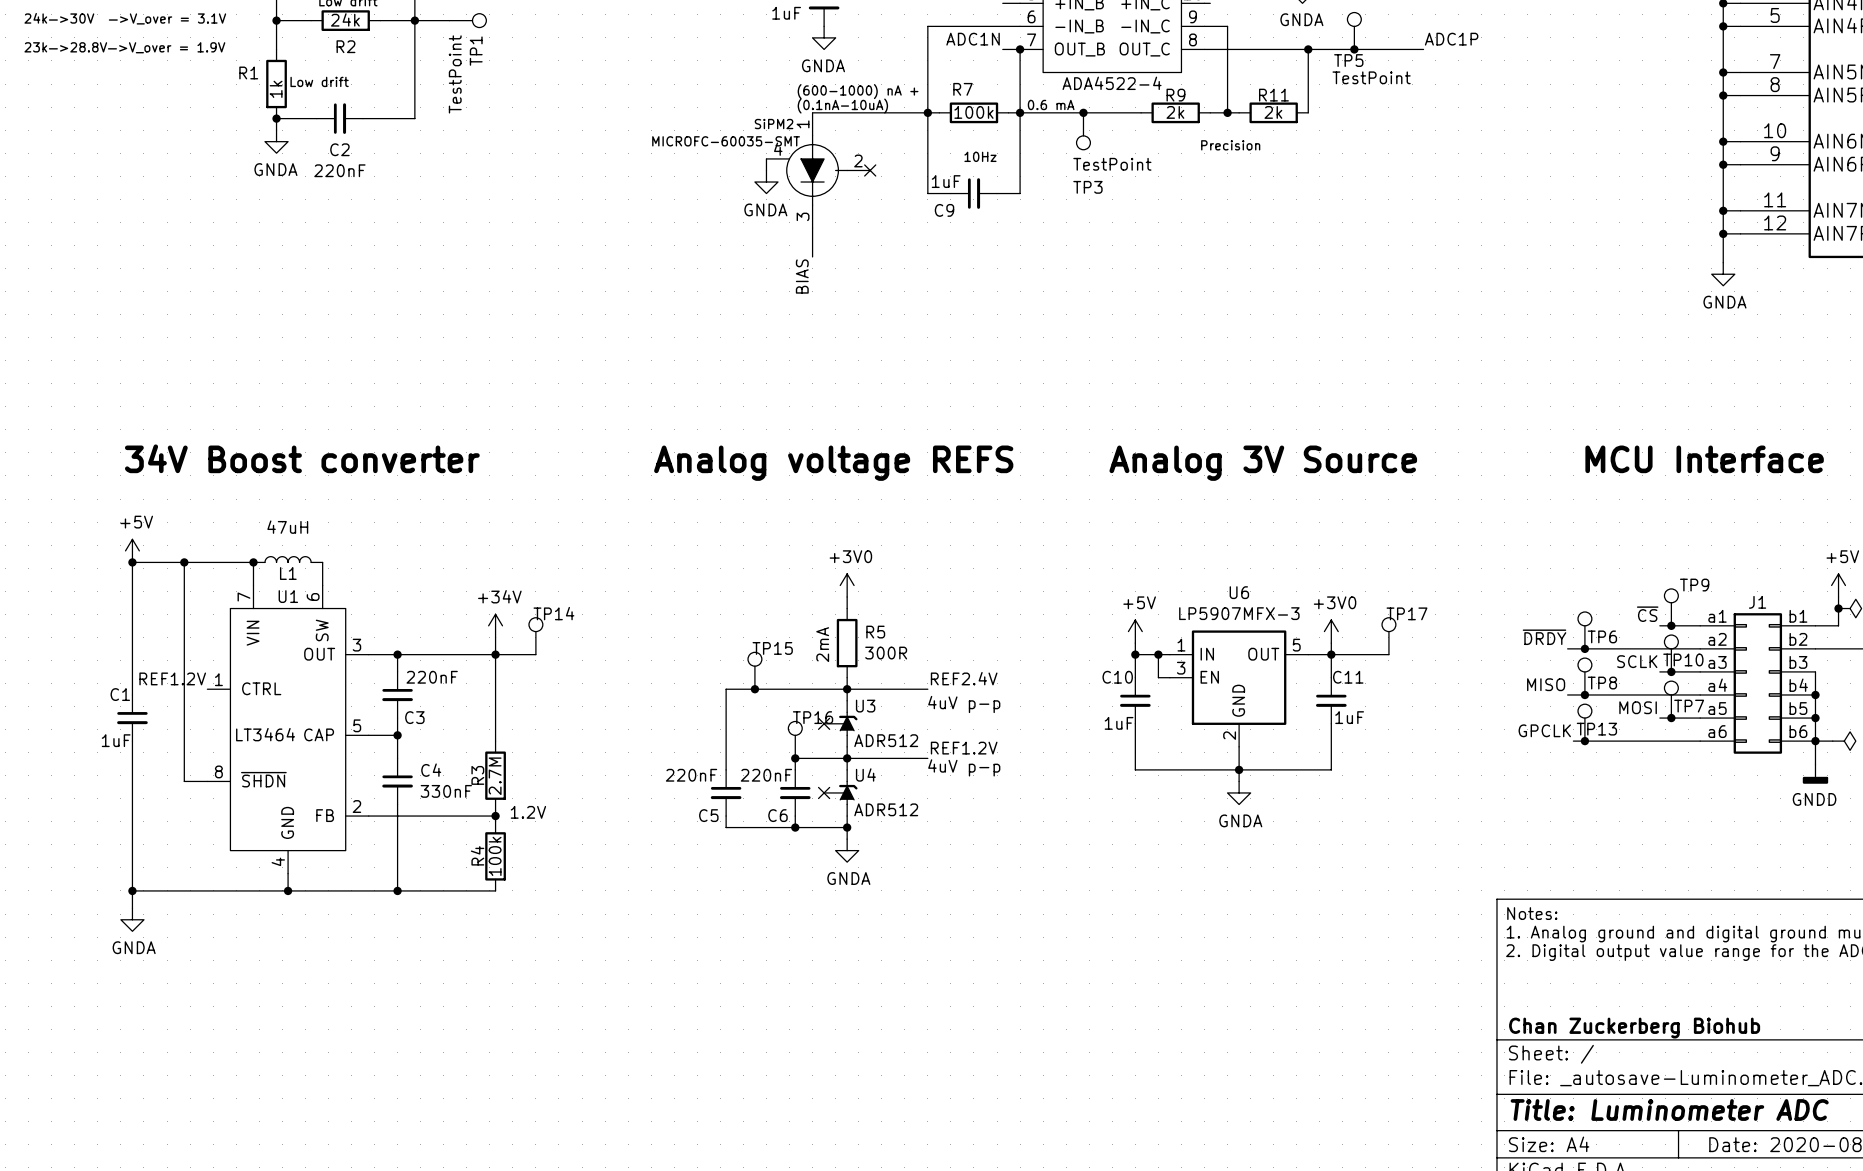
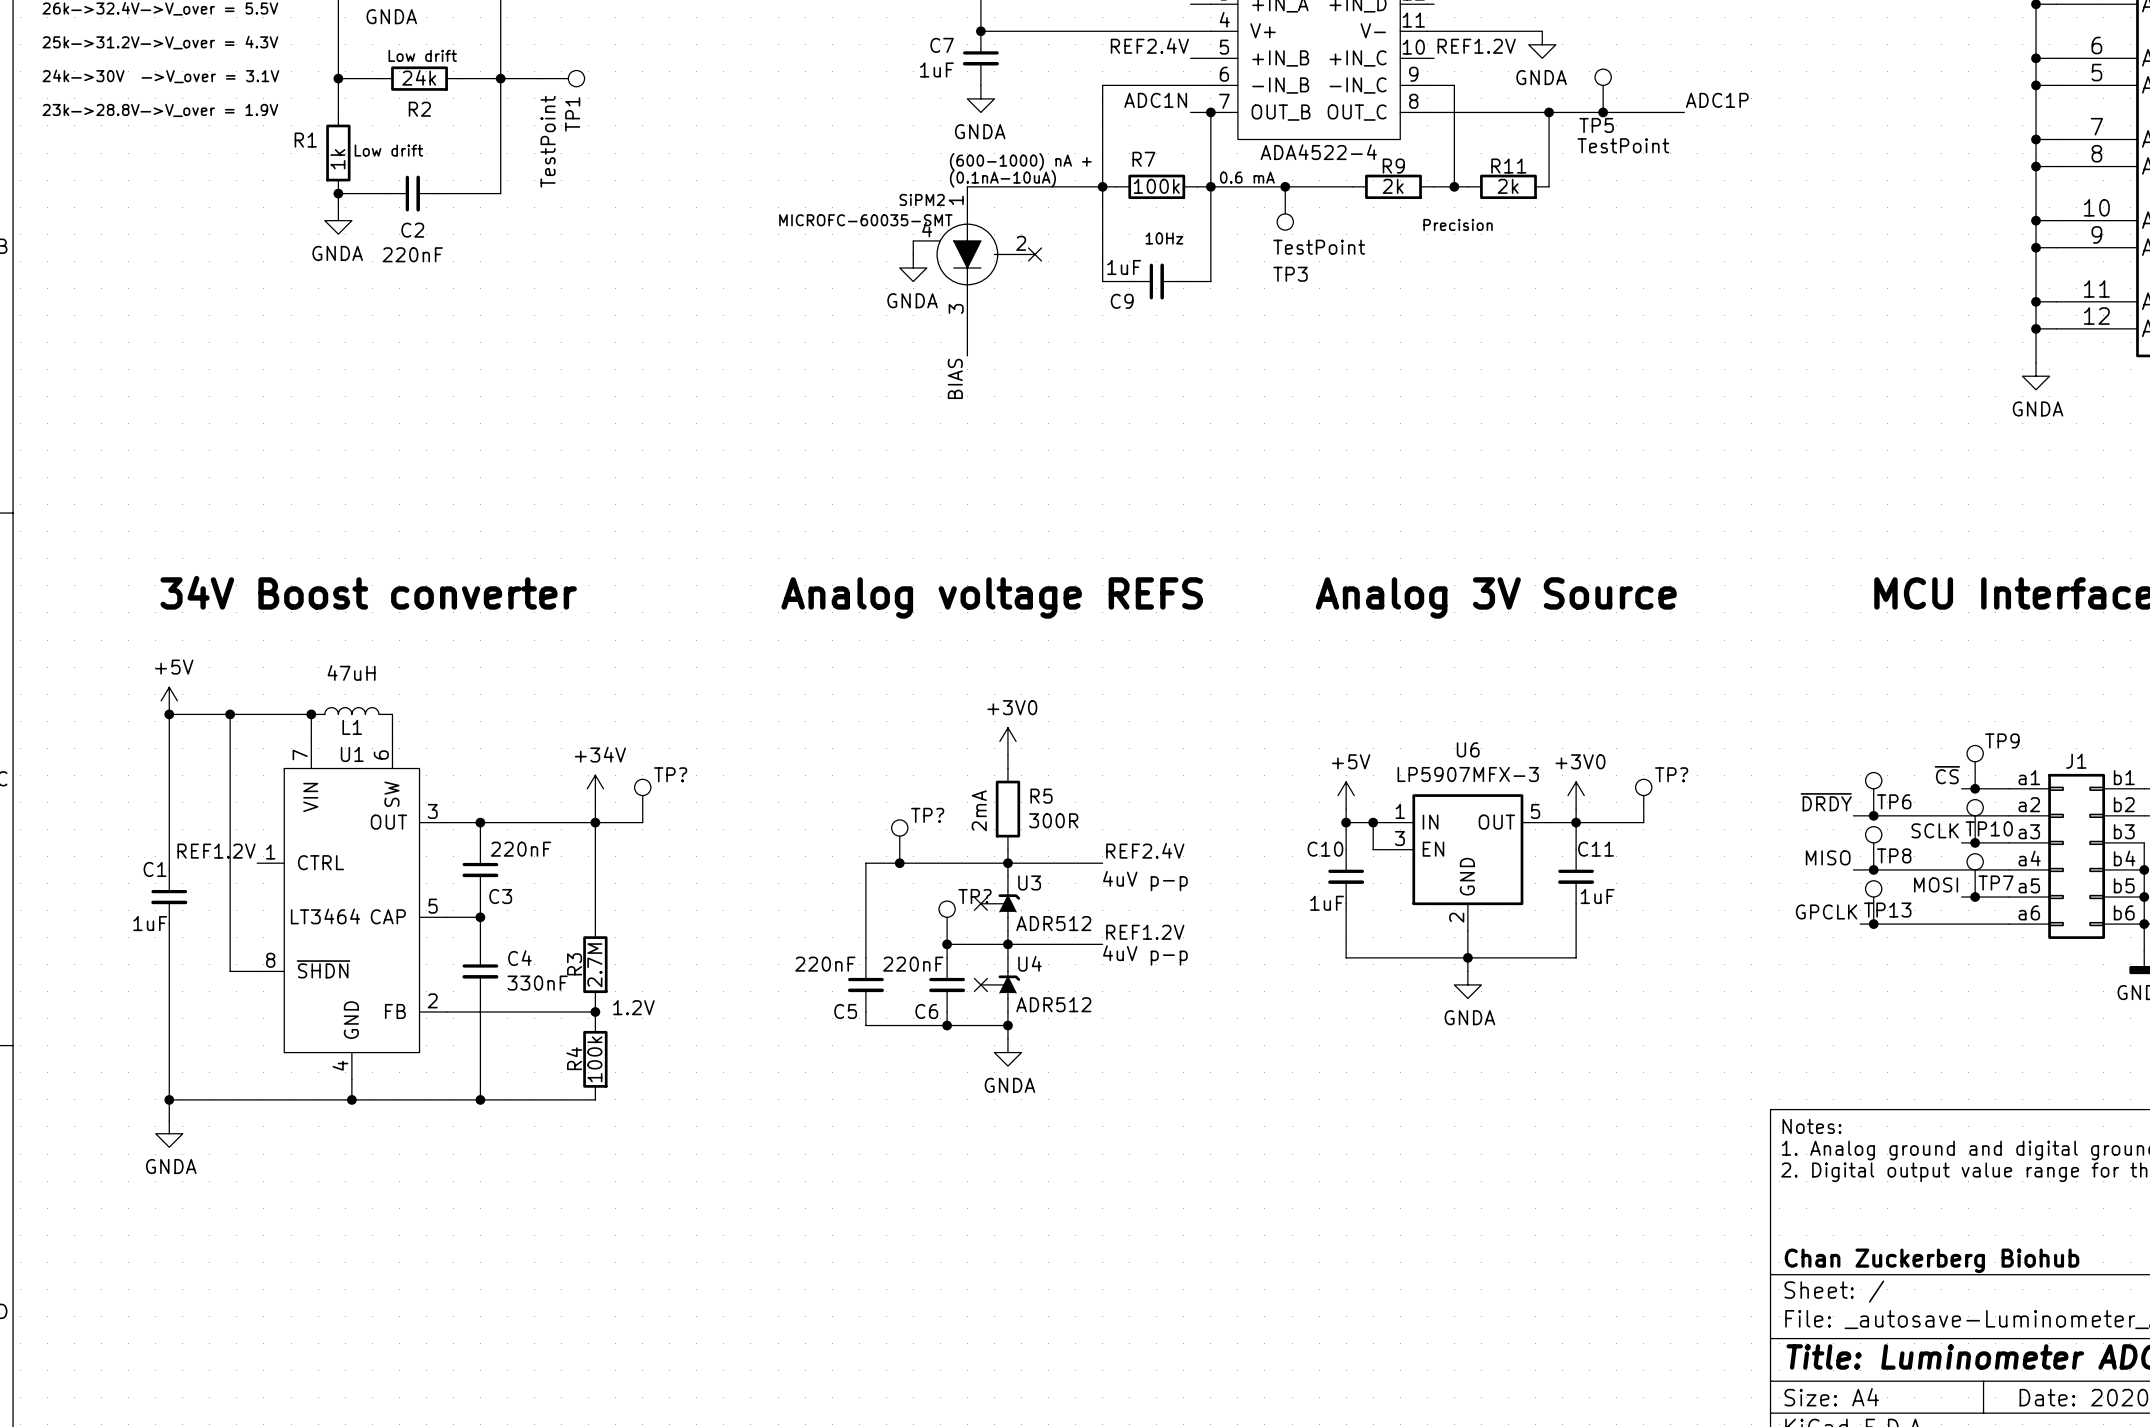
TP14 name: TP14 (553, 613) -> TP? (670, 774)
TP17 name: TP17 (1406, 613) -> TP? (1671, 774)
TP15 name: TP15 (772, 648) -> TP? (927, 815)
TP16 name: TP16 (813, 717) -> TP? (975, 896)

